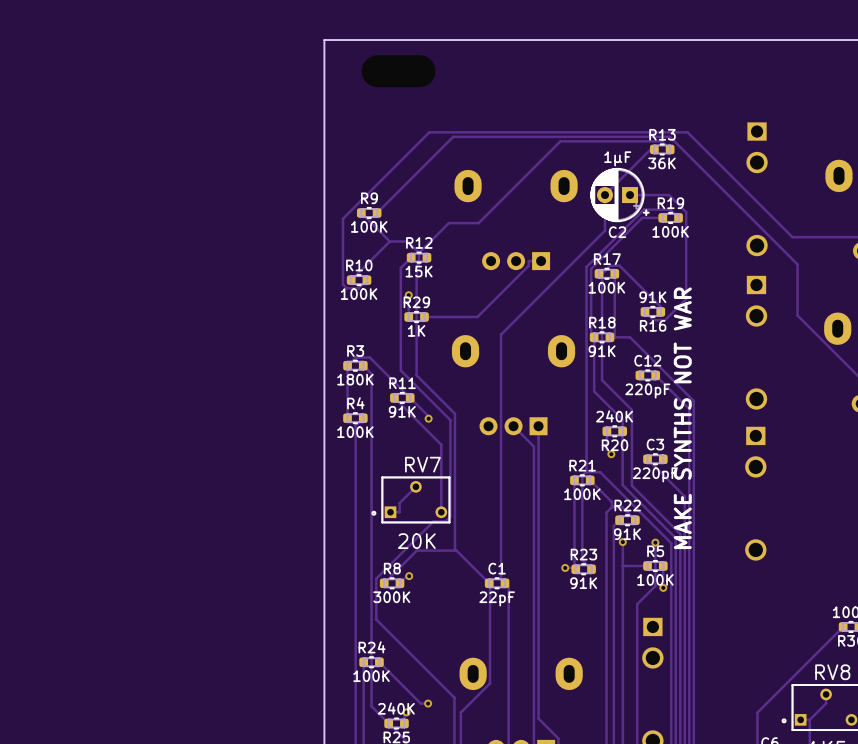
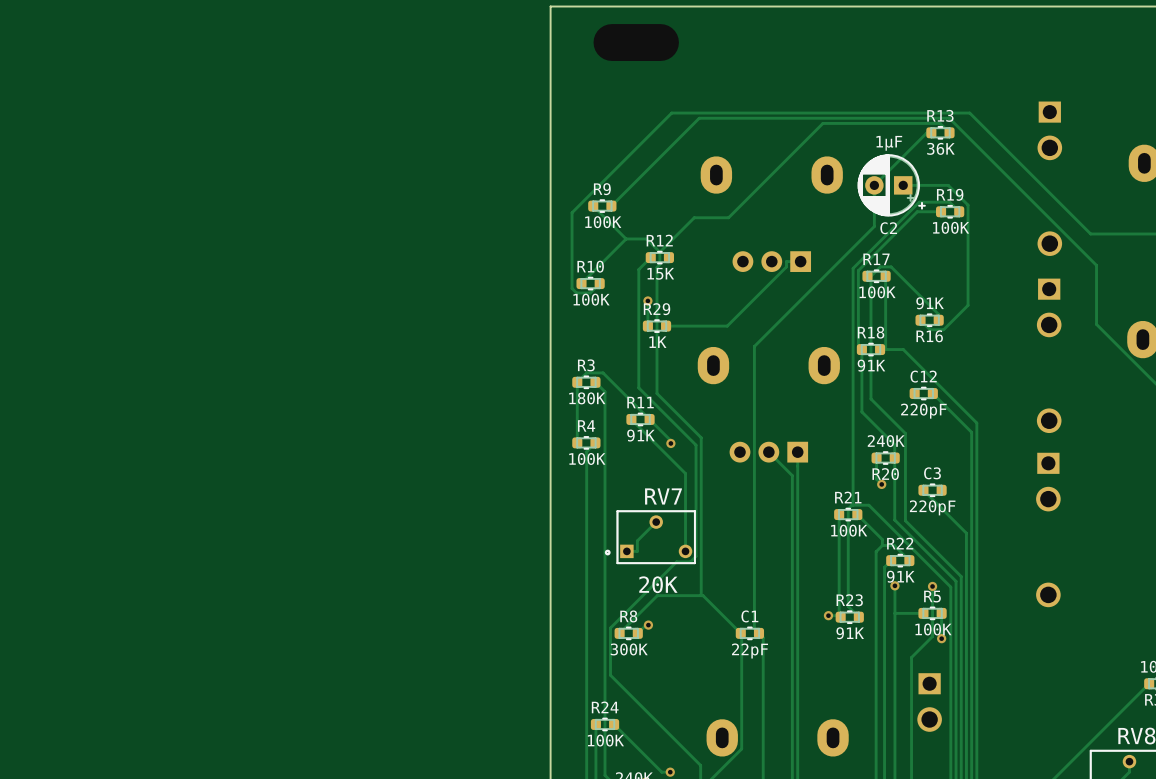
text: MAKE SYNTHS NOT WAR (682, 418) -> none

